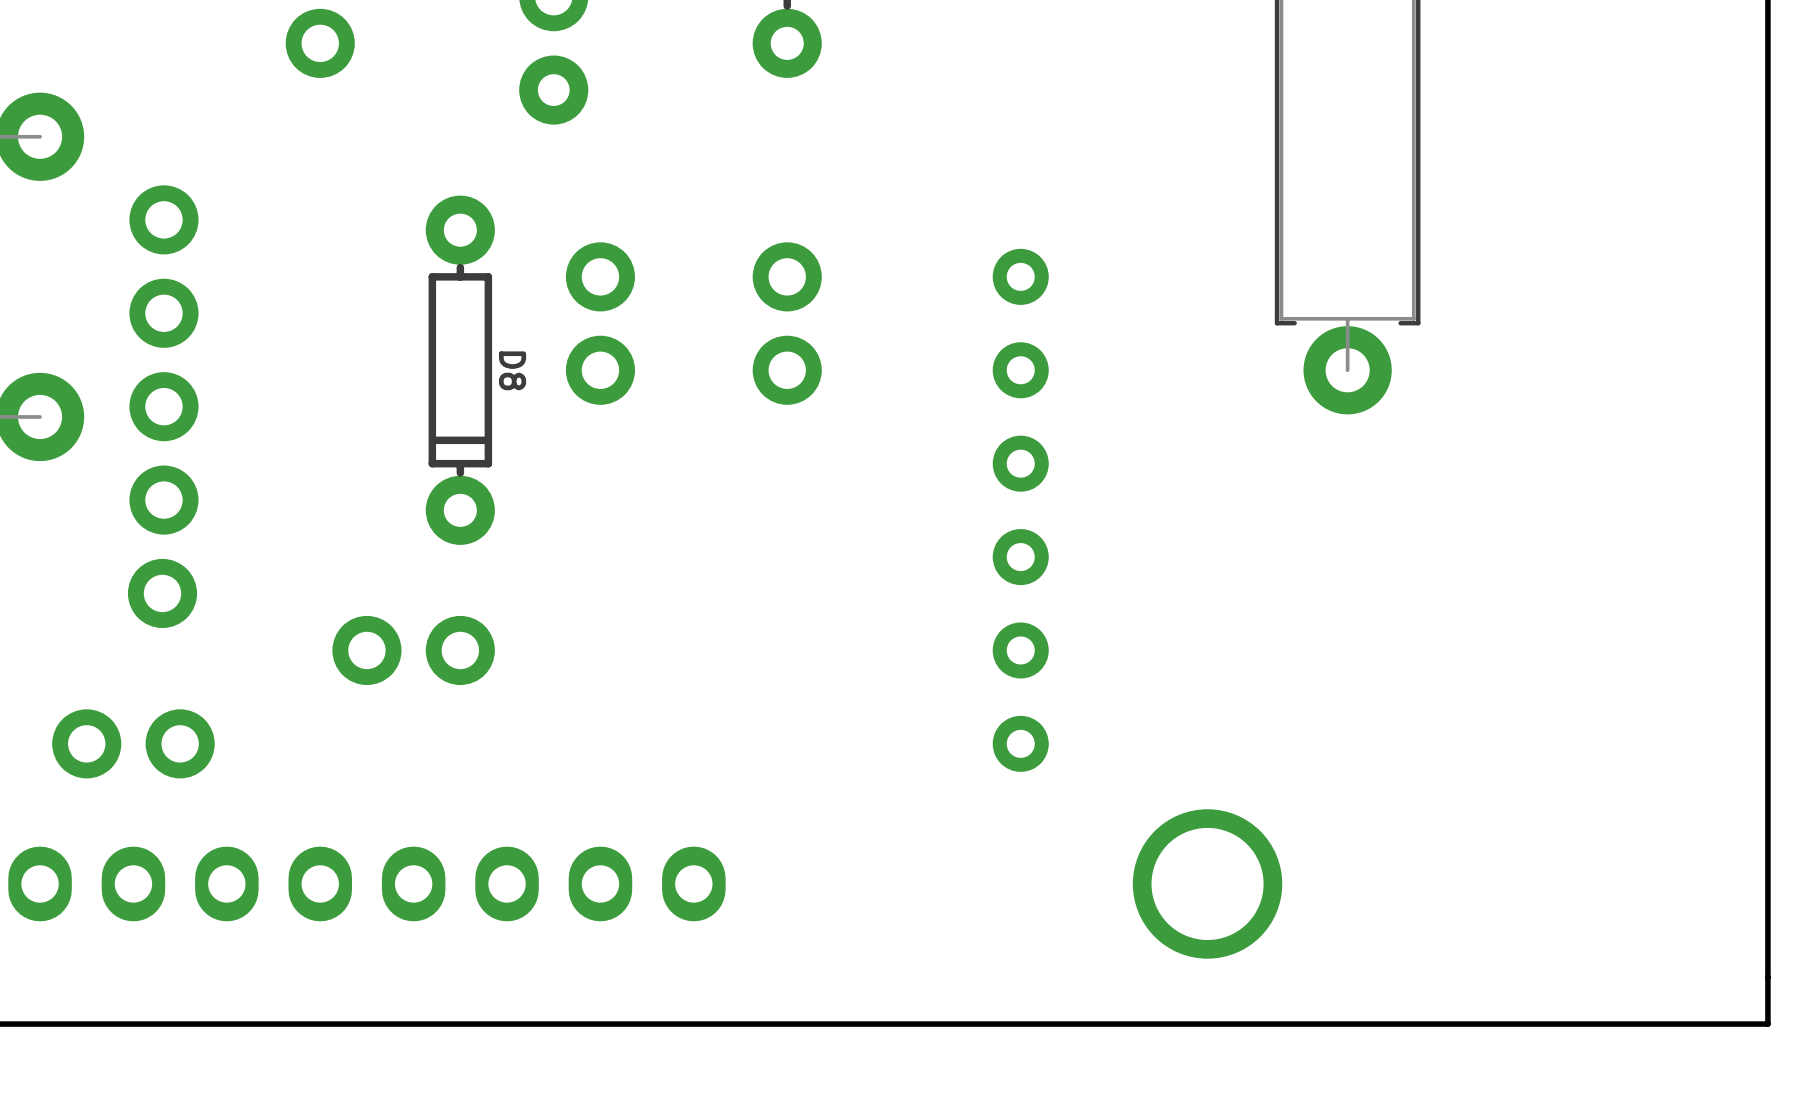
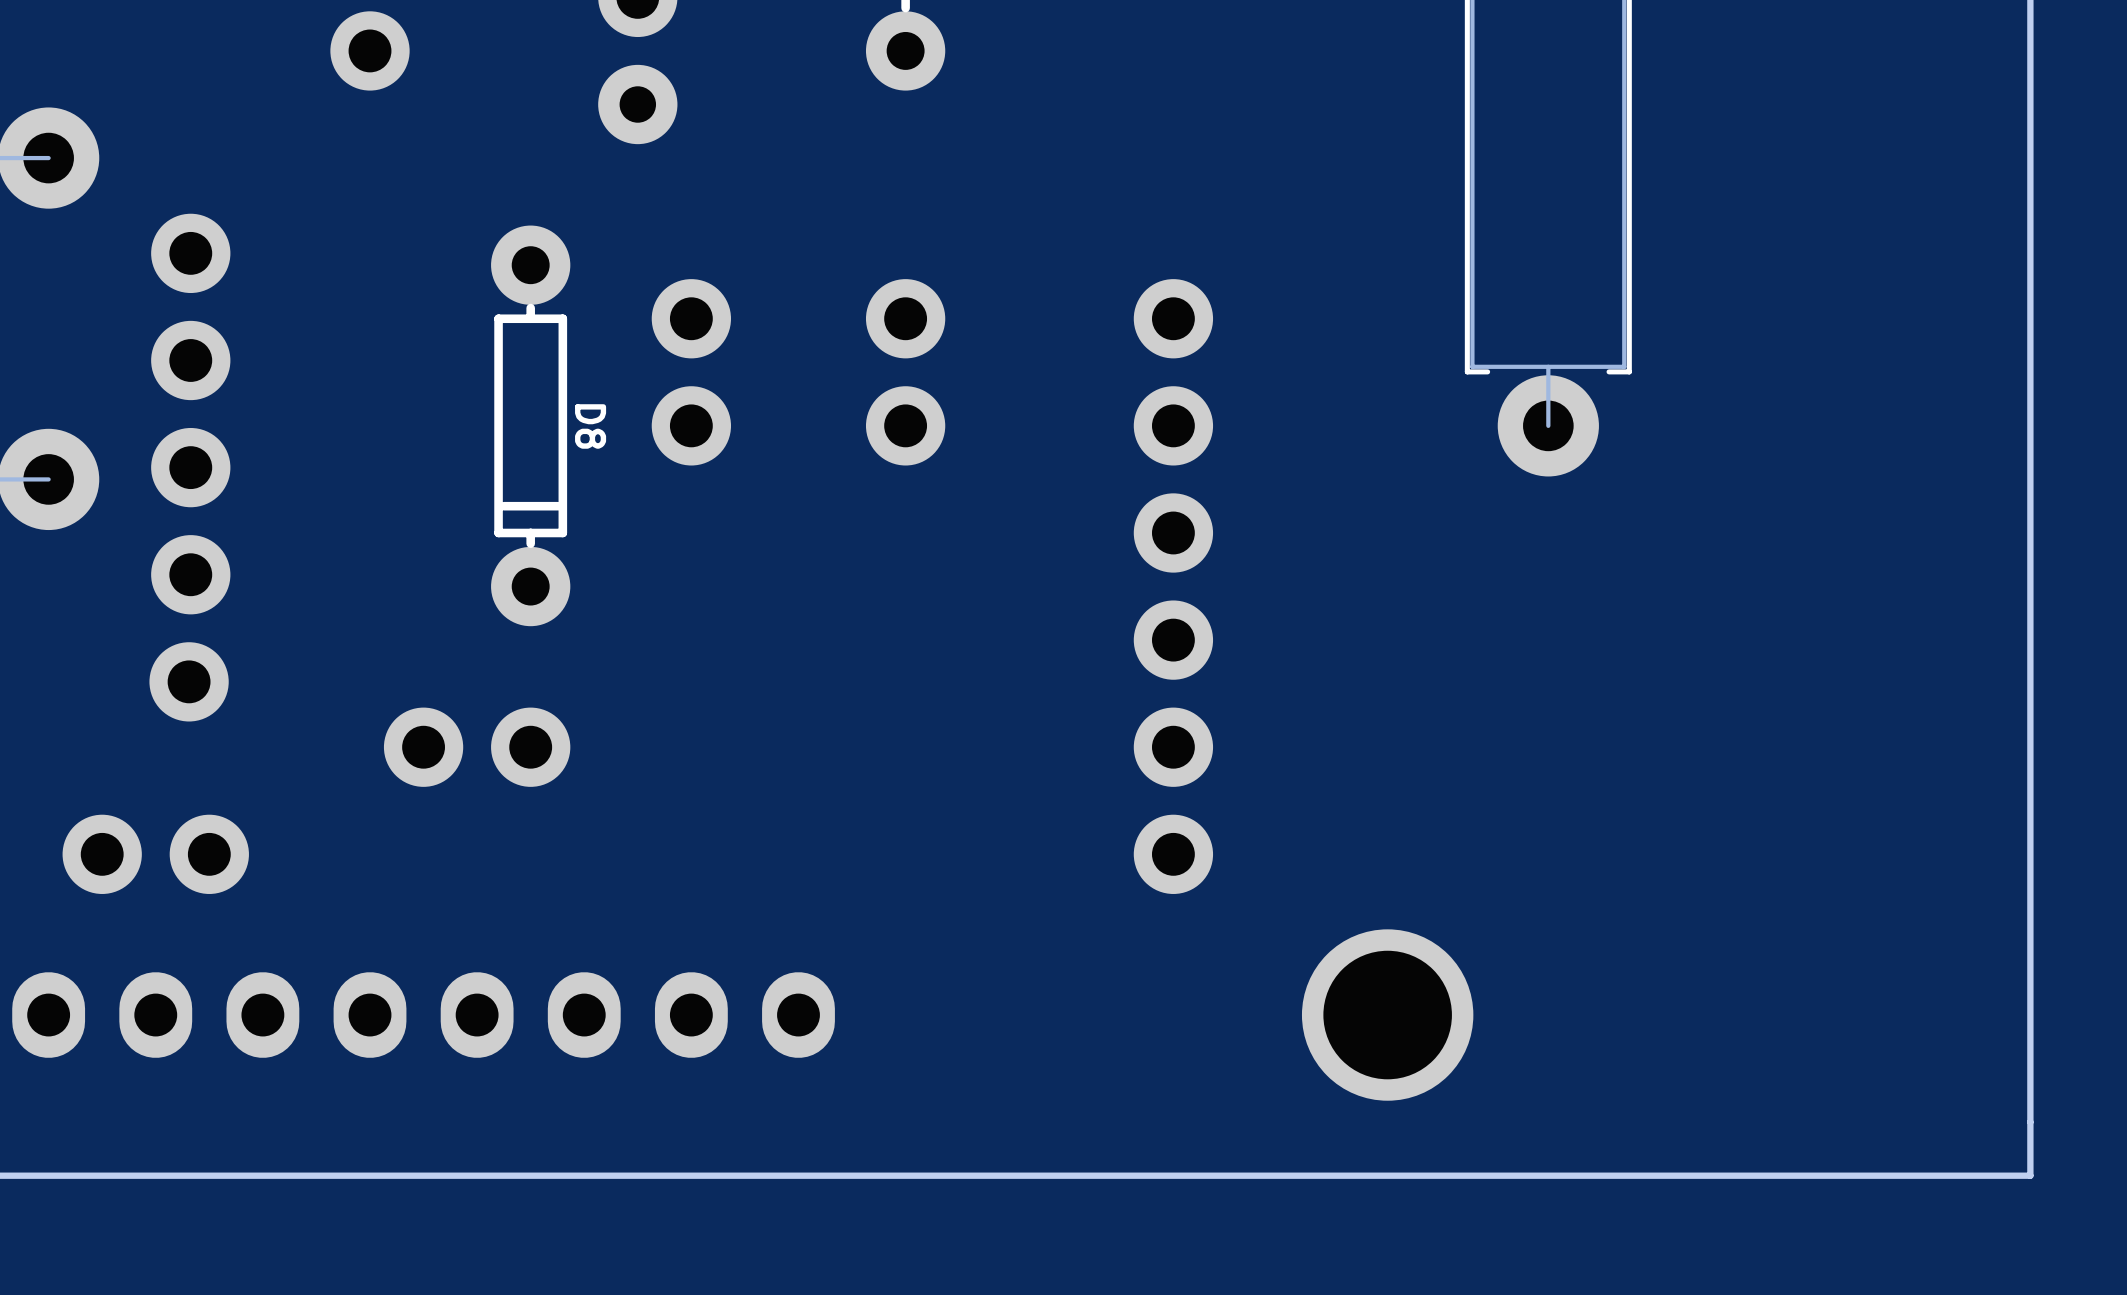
part footprint: [992, 248, 1049, 772] -> [1133, 279, 1214, 894]

